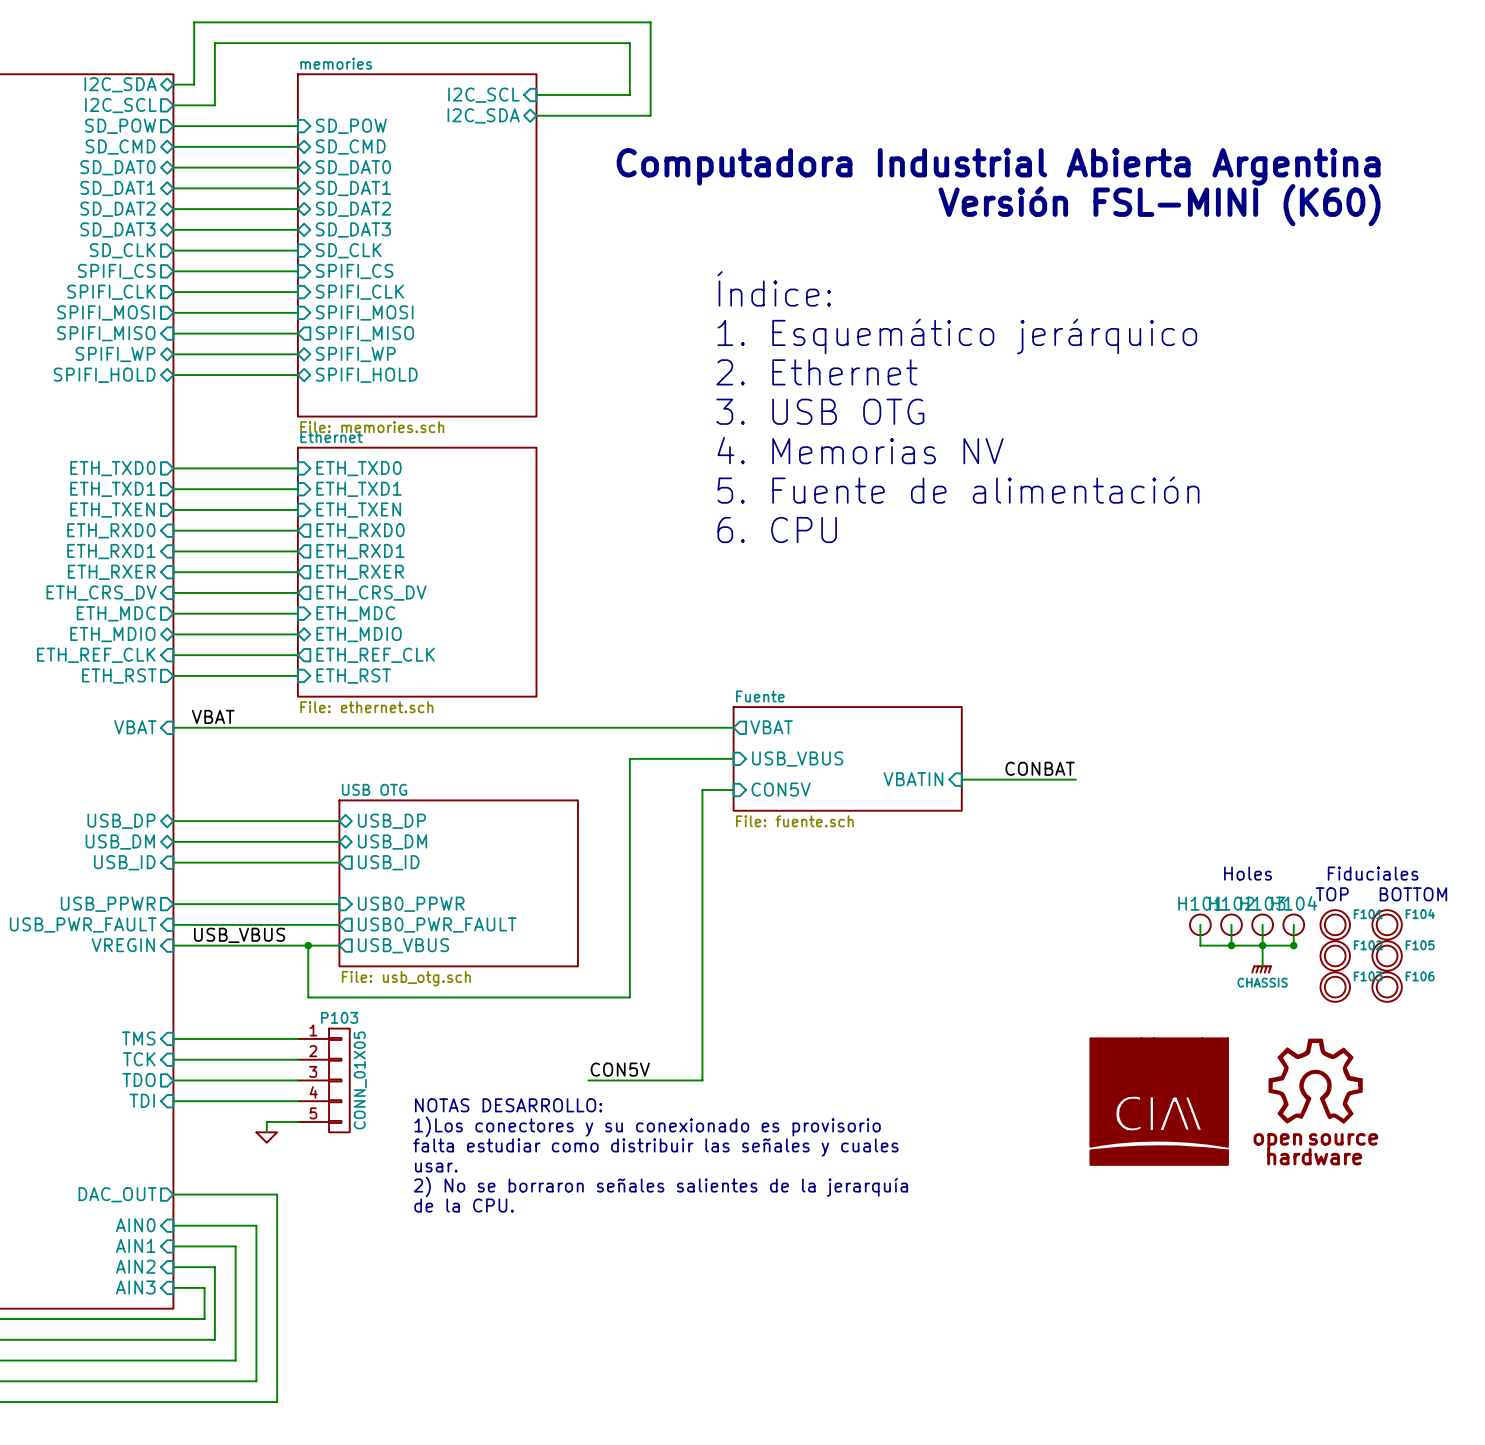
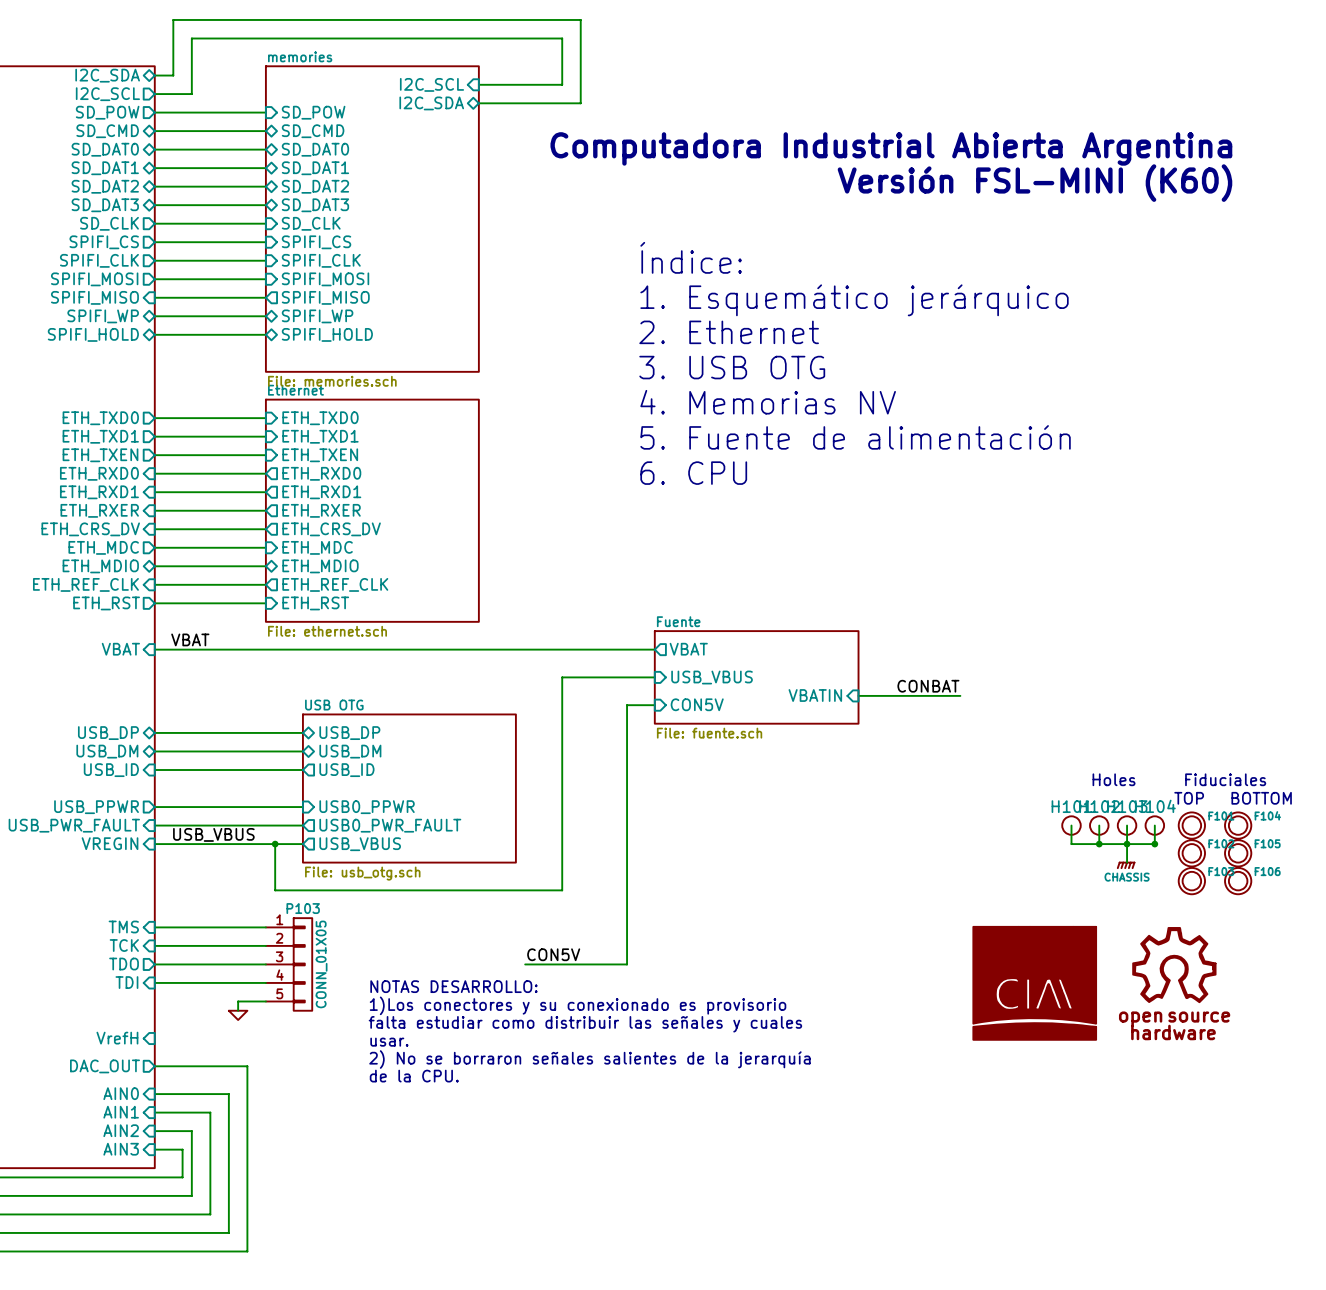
sheet pin: none -> VrefH (117, 1038)

